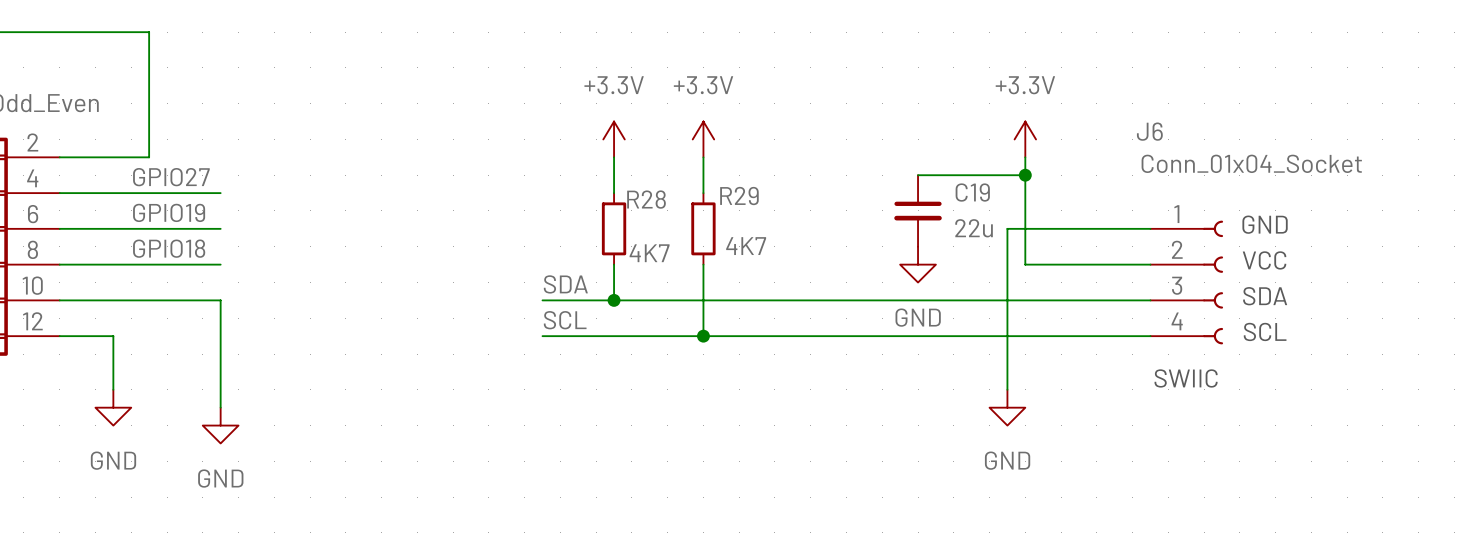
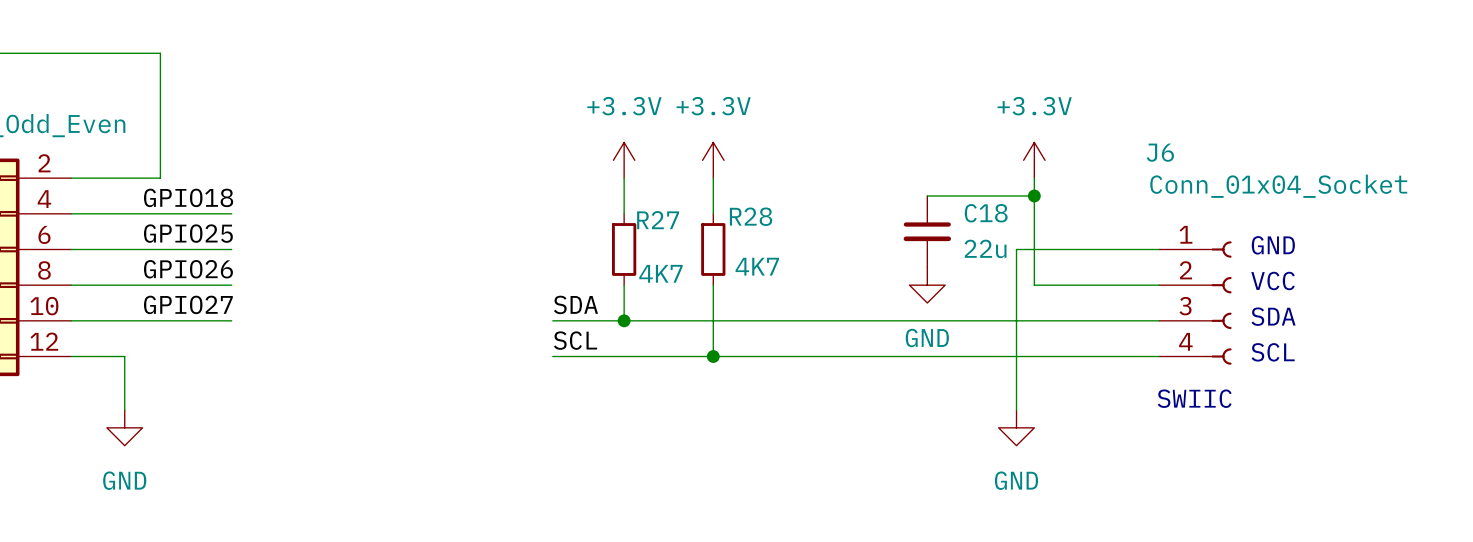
label: GPIO27 (171, 177) -> GPIO18 (188, 197)
C19 name: C19 (972, 192) -> C18 (986, 213)
R29 name: R29 (739, 196) -> R28 (751, 216)
R28 name: R28 (646, 199) -> R27 (658, 220)
label: GPIO19 (169, 212) -> GPIO25 (188, 233)
label: GPIO18 (169, 248) -> GPIO26 (188, 269)
label: none -> GPIO27 (188, 304)
wire: (220, 300) (220, 407) -> none
power symbol: GND (220, 425) -> none

